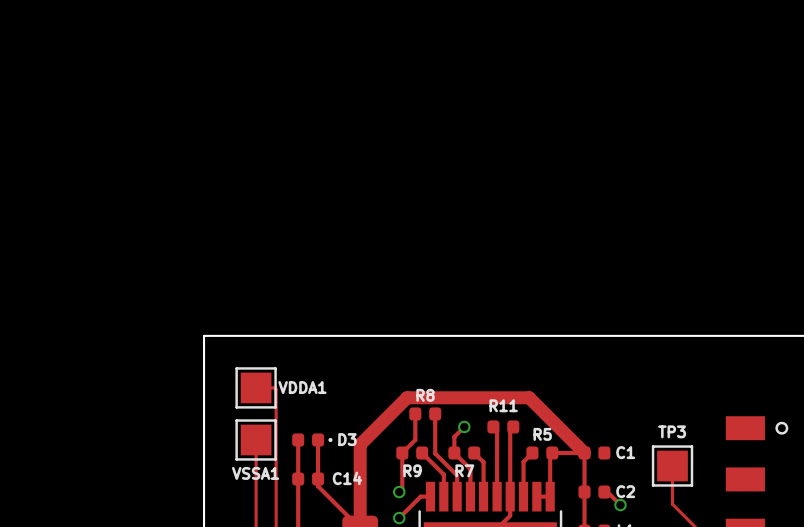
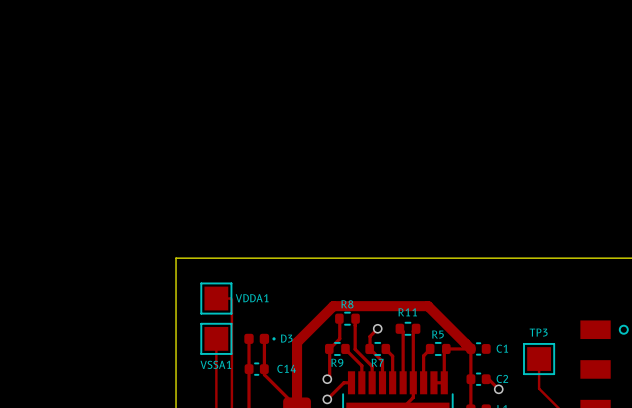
R8 footprint: [409, 407, 442, 421] -> [335, 311, 360, 326]
R11 footprint: [487, 420, 520, 434] -> [395, 321, 421, 336]
R9 footprint: [396, 446, 429, 460] -> [325, 341, 350, 356]
R7 footprint: [448, 446, 481, 460] -> [365, 341, 391, 356]
R5 footprint: [526, 446, 559, 460] -> [425, 341, 451, 356]
C1 footprint: [578, 446, 611, 460] -> [466, 342, 491, 356]
C14 footprint: [292, 472, 325, 486] -> [244, 362, 269, 376]
C2 footprint: [578, 485, 611, 499] -> [466, 372, 491, 386]

